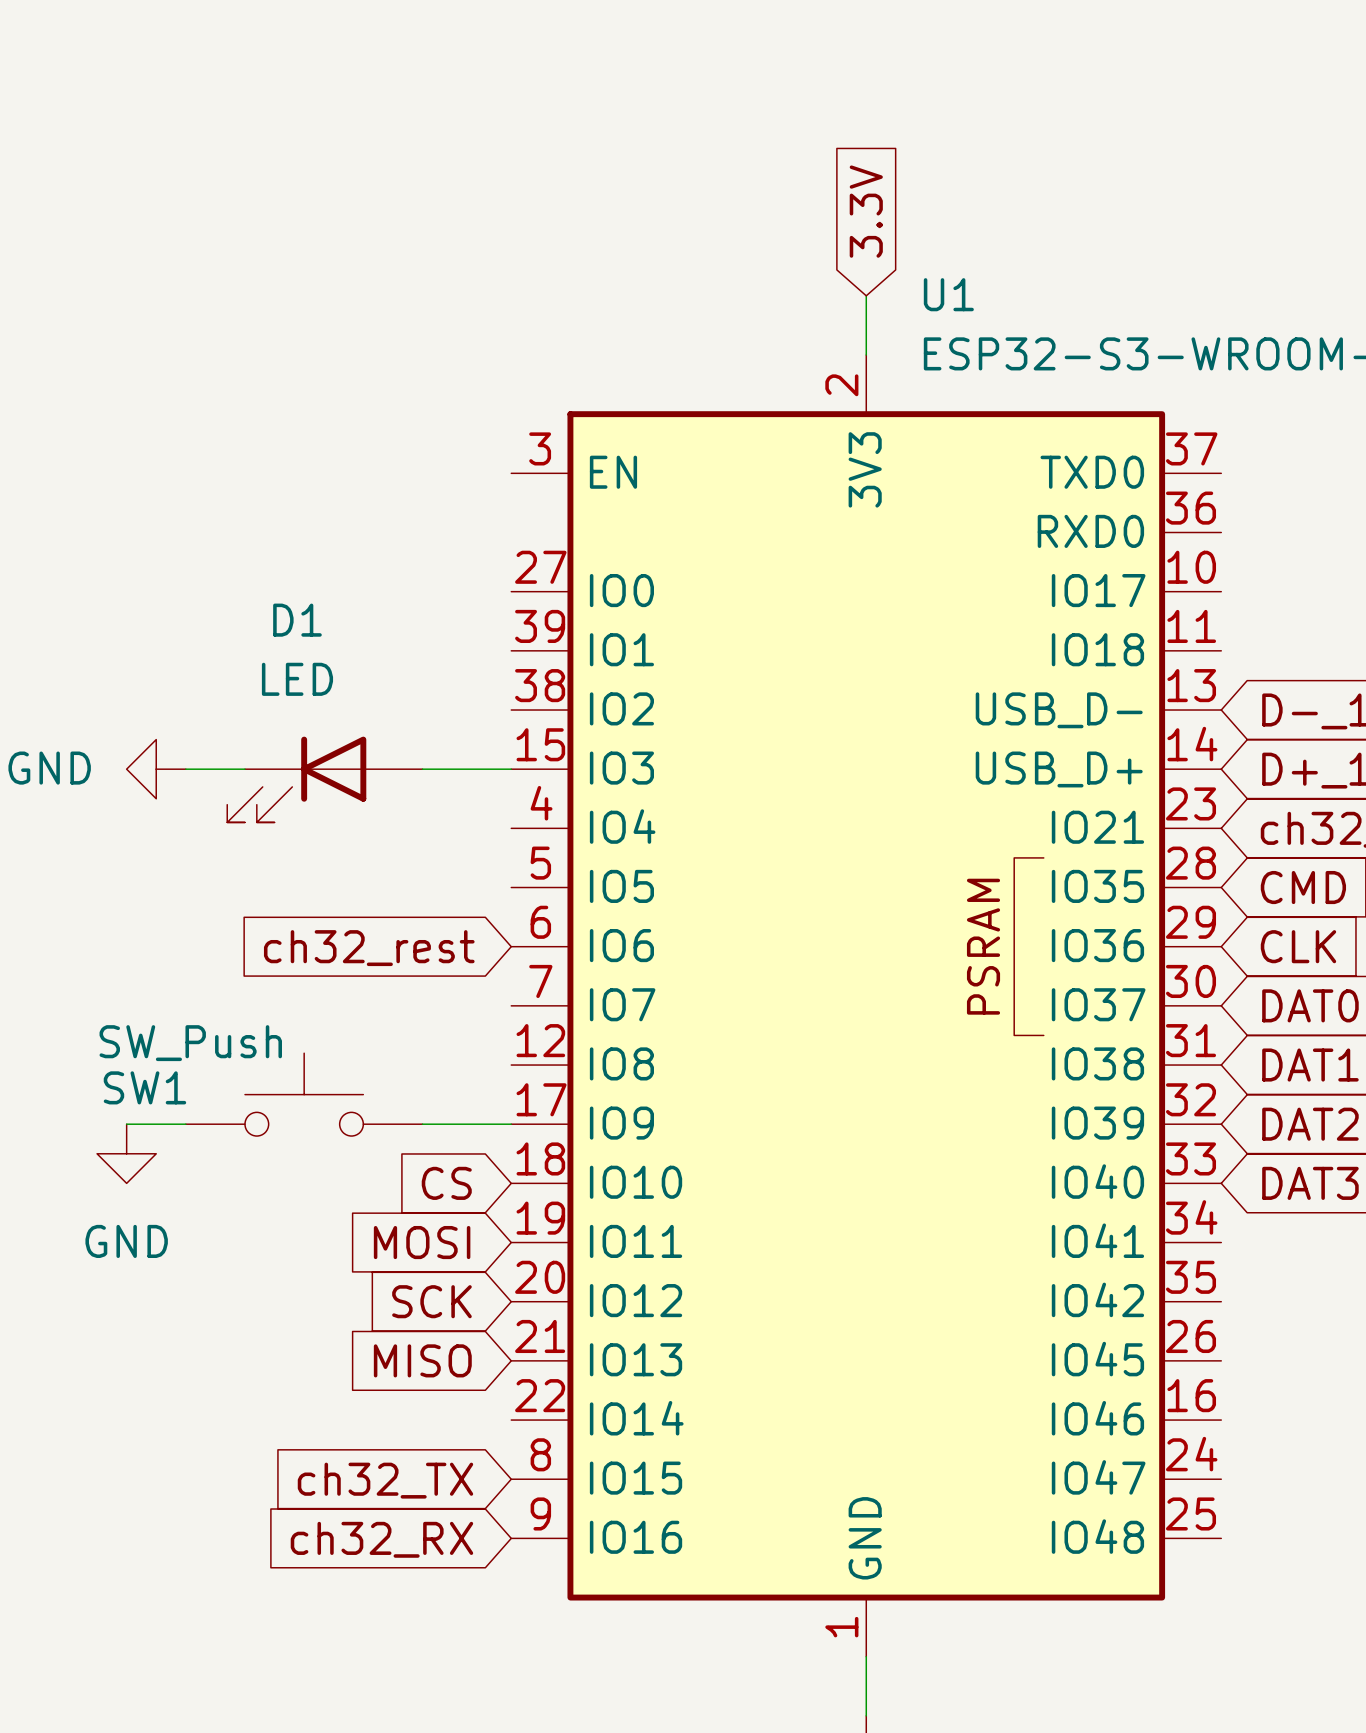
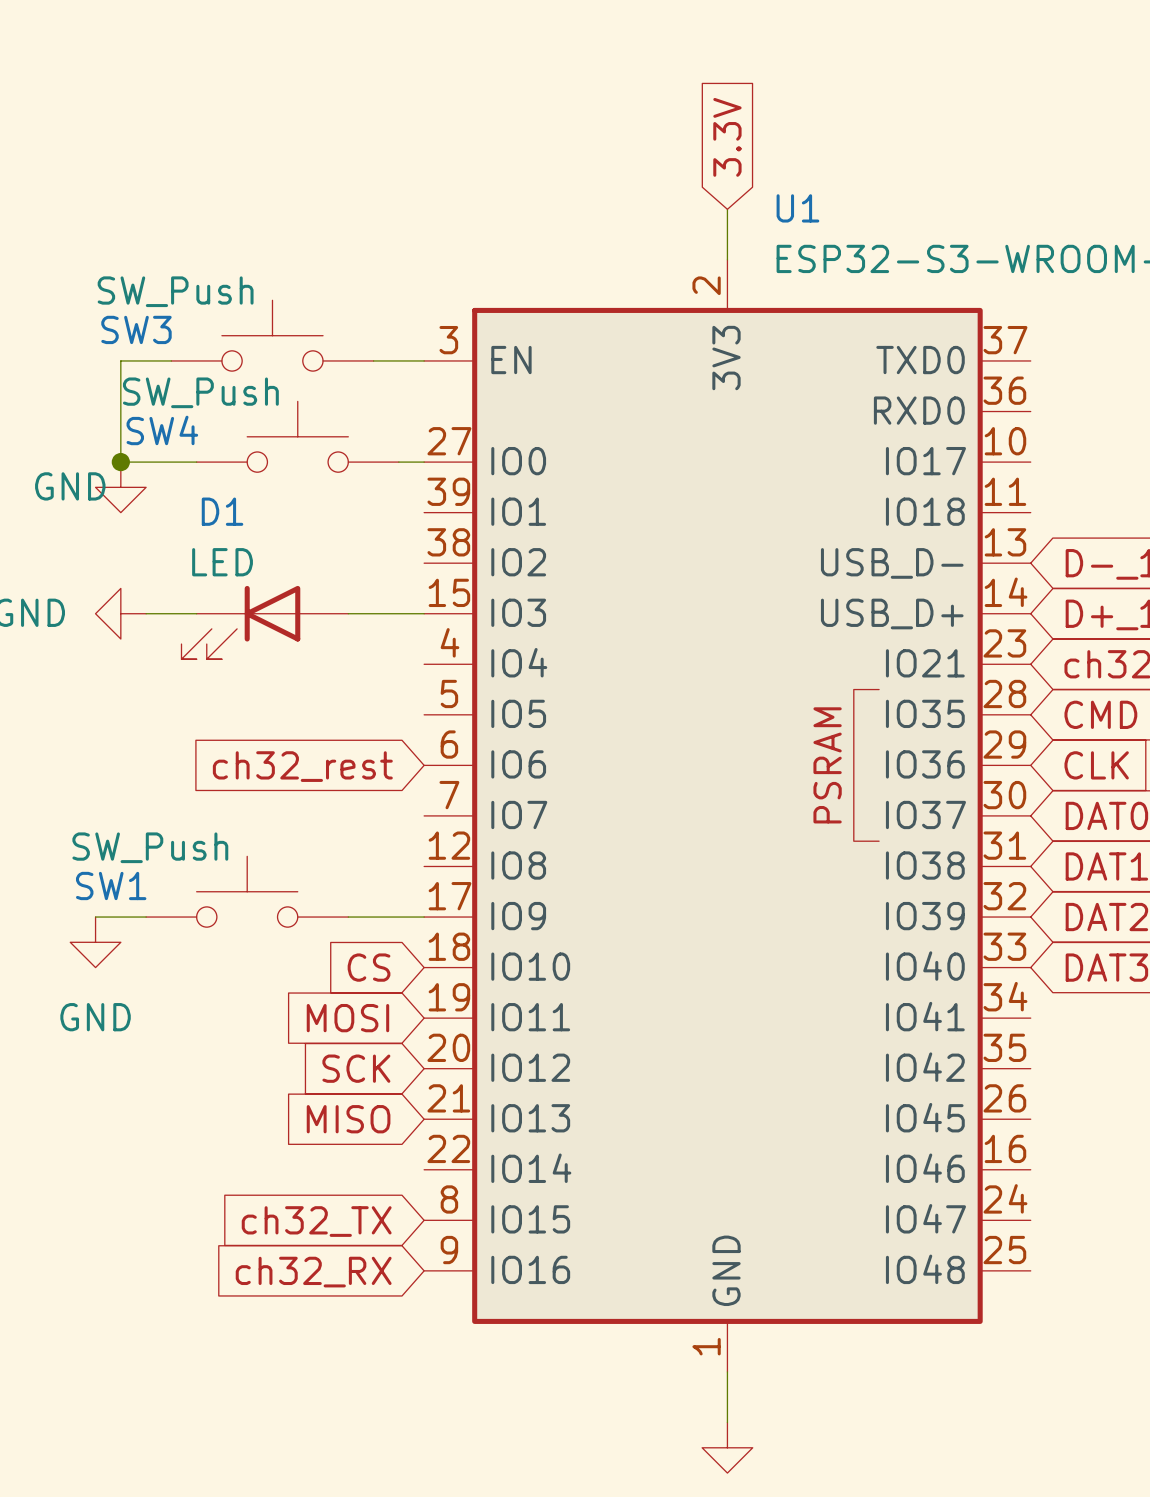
SW3: none -> SW_Push (272, 335)
wire: none -> (171, 360) (120, 360) (120, 462) (196, 462)
wire: none -> (373, 360) (424, 360)
SW4: none -> SW_Push (297, 436)
junction: none -> (120, 462)
wire: none -> (398, 462) (424, 462)
D1 name position: D1 (297, 620) -> D1 (222, 511)
power symbol: none -> GND (120, 487)
D1 value position: LED (297, 679) -> LED (222, 562)

